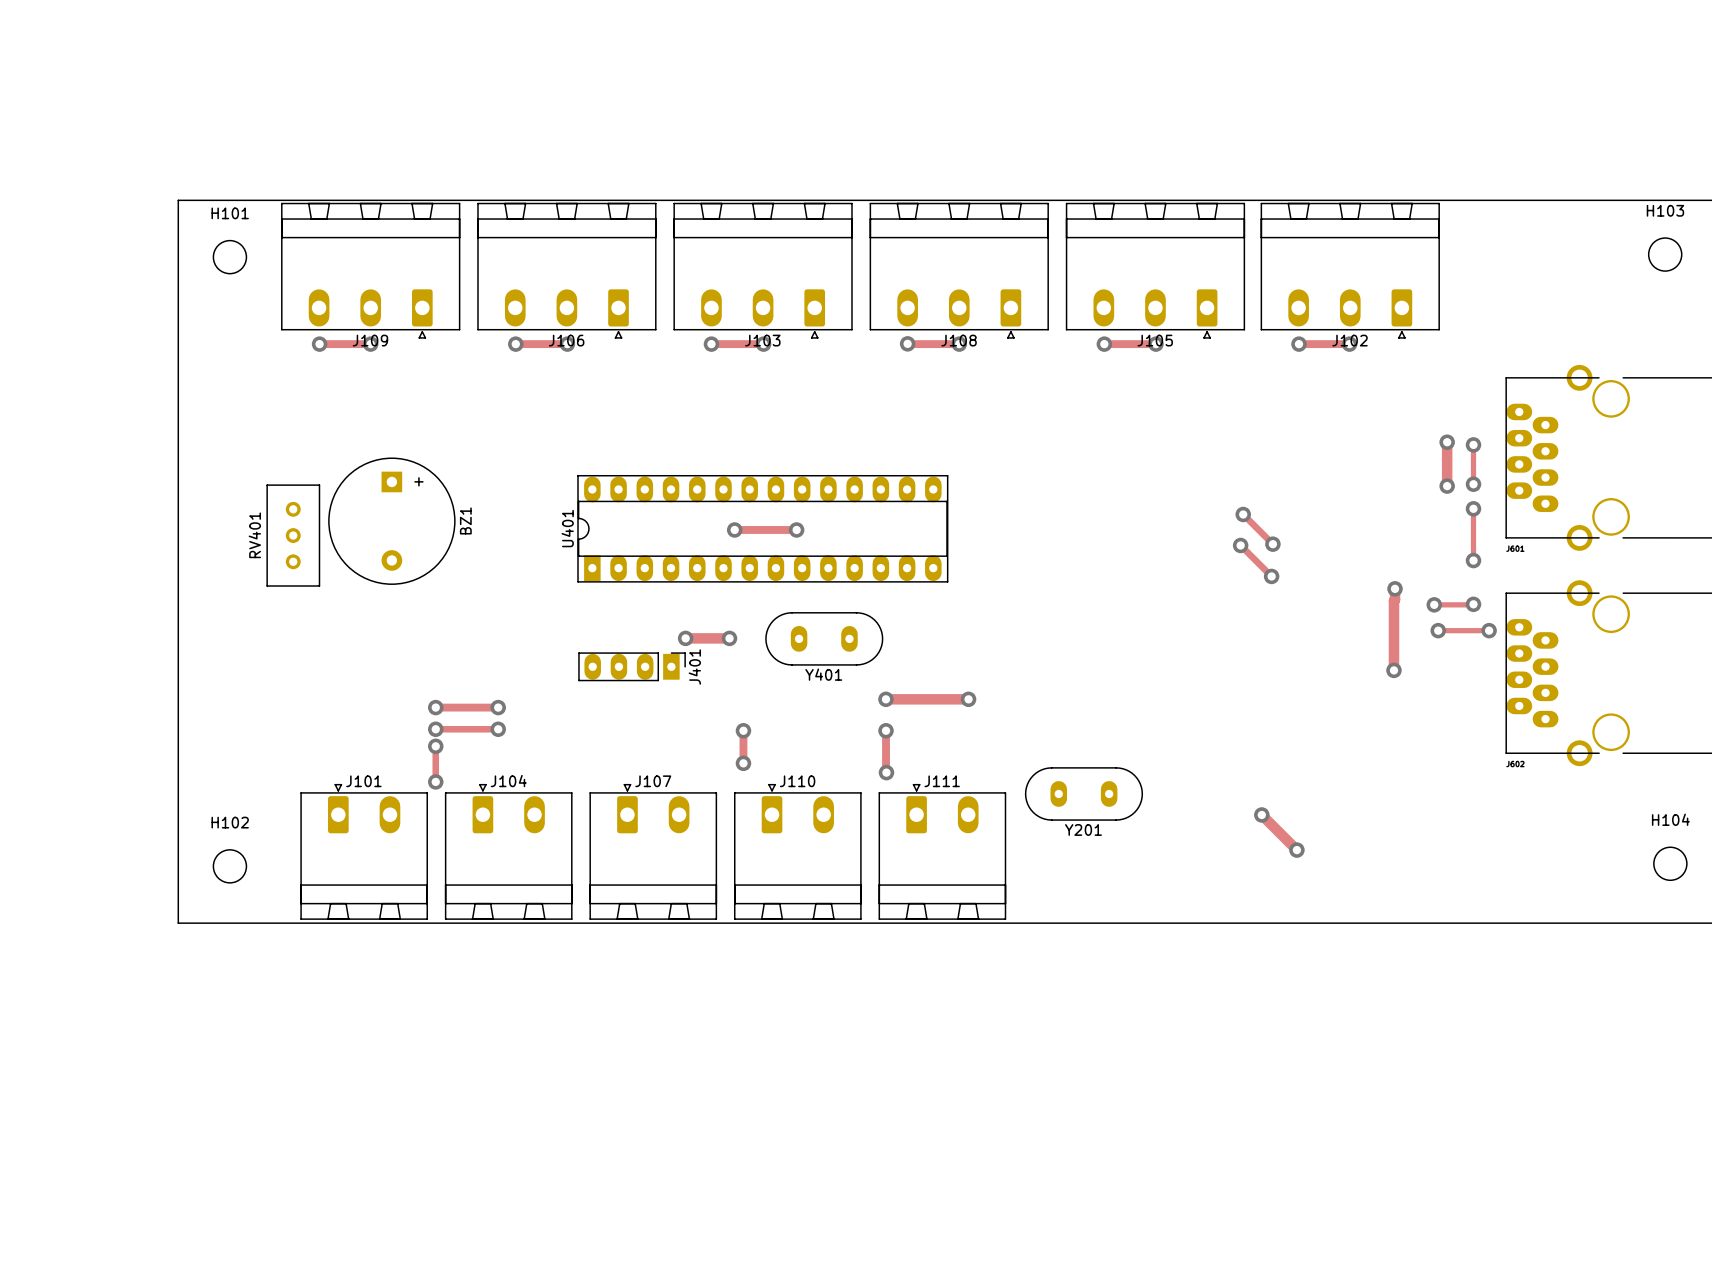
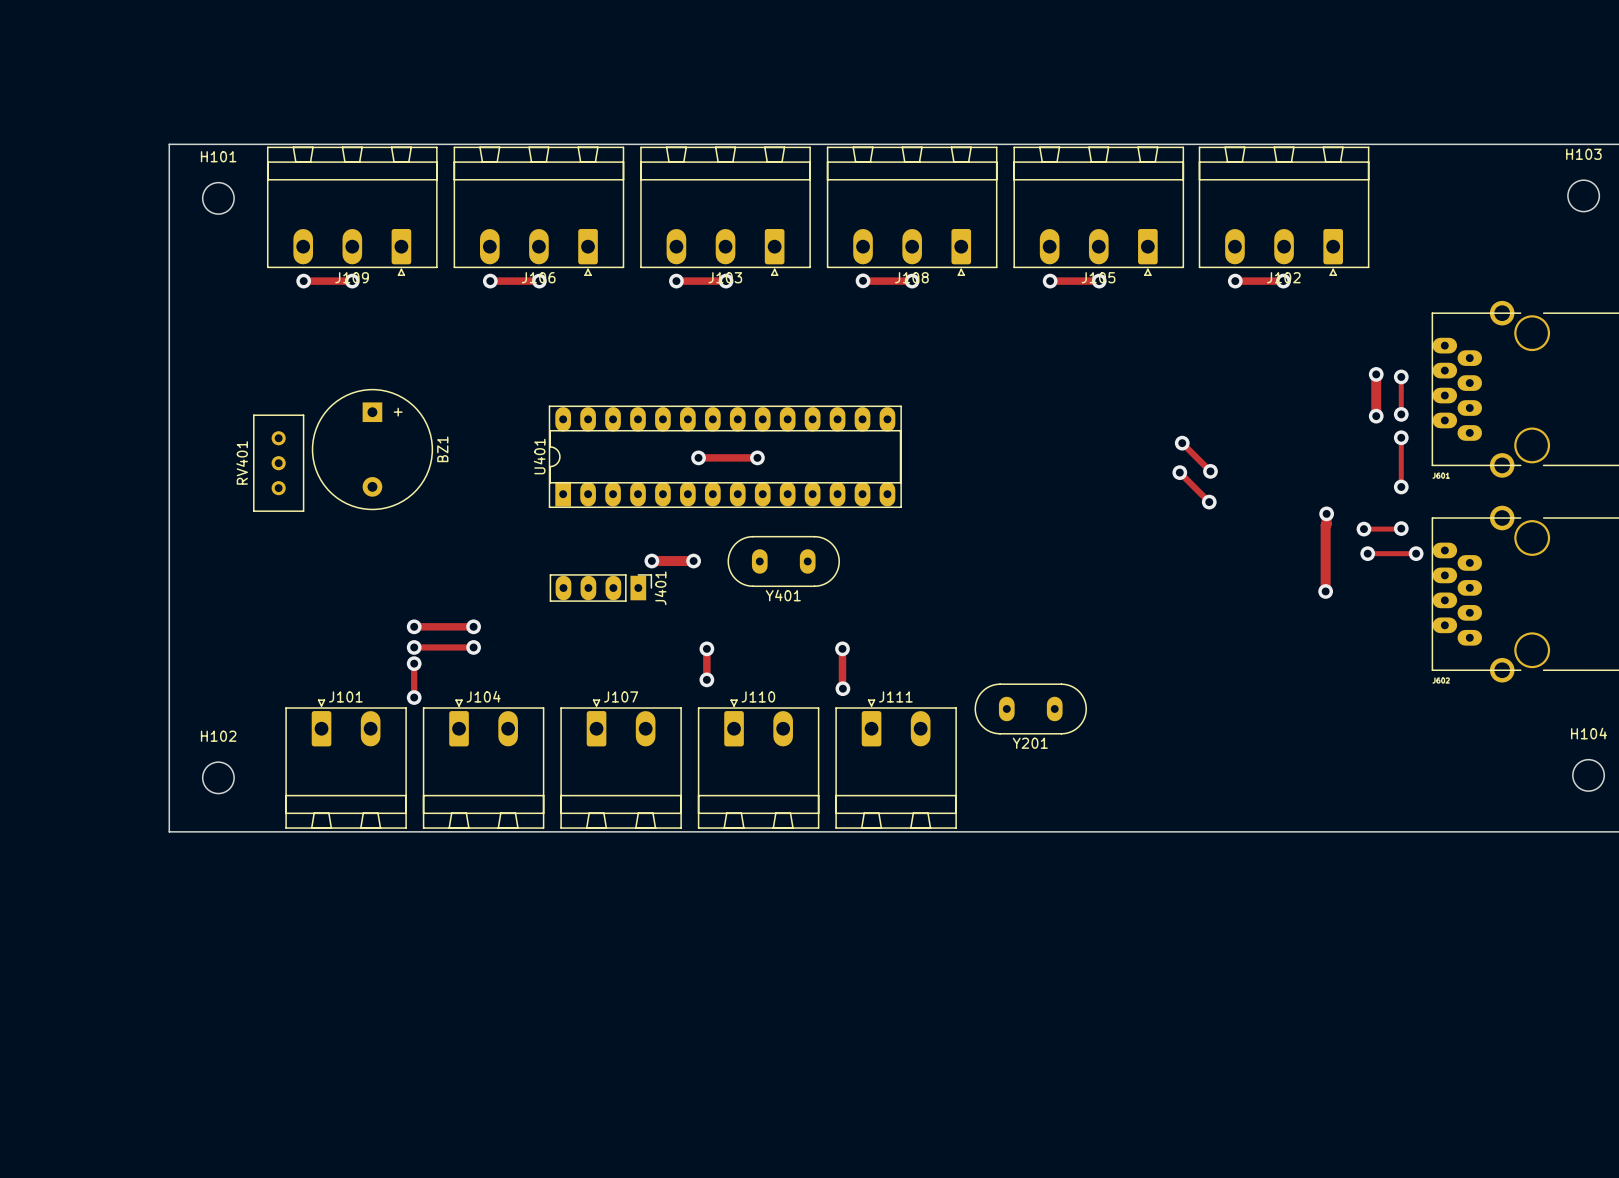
track: (885, 699) (968, 699) -> none
via: (885, 699) -> none
via: (968, 699) -> none
track: (1261, 814) (1296, 850) -> none
via: (1261, 814) -> none
via: (1296, 850) -> none

